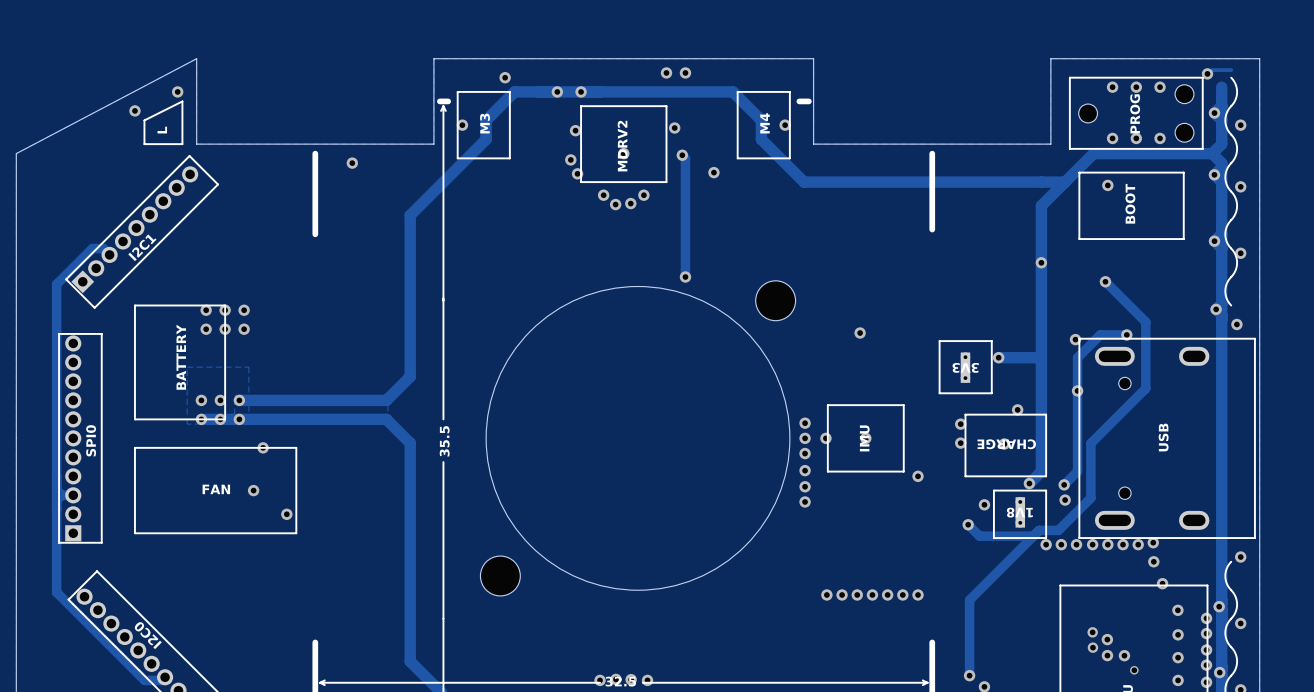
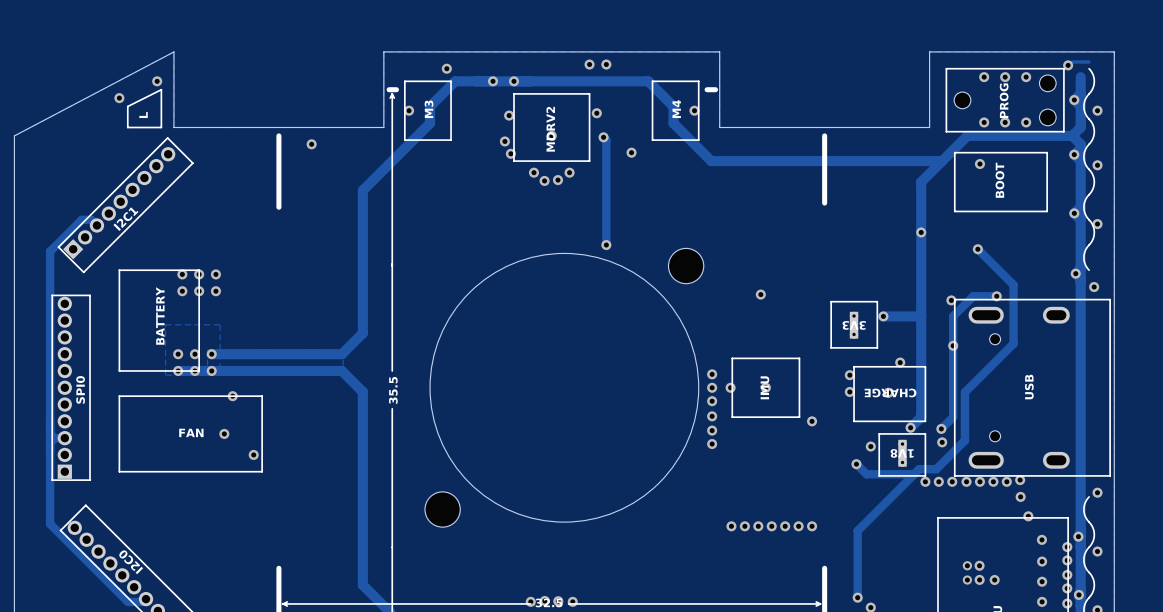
via: (1092, 632) -> none
via: none -> (967, 565)
via: (1092, 647) -> none
via: none -> (967, 580)
via: (1134, 670) -> none

